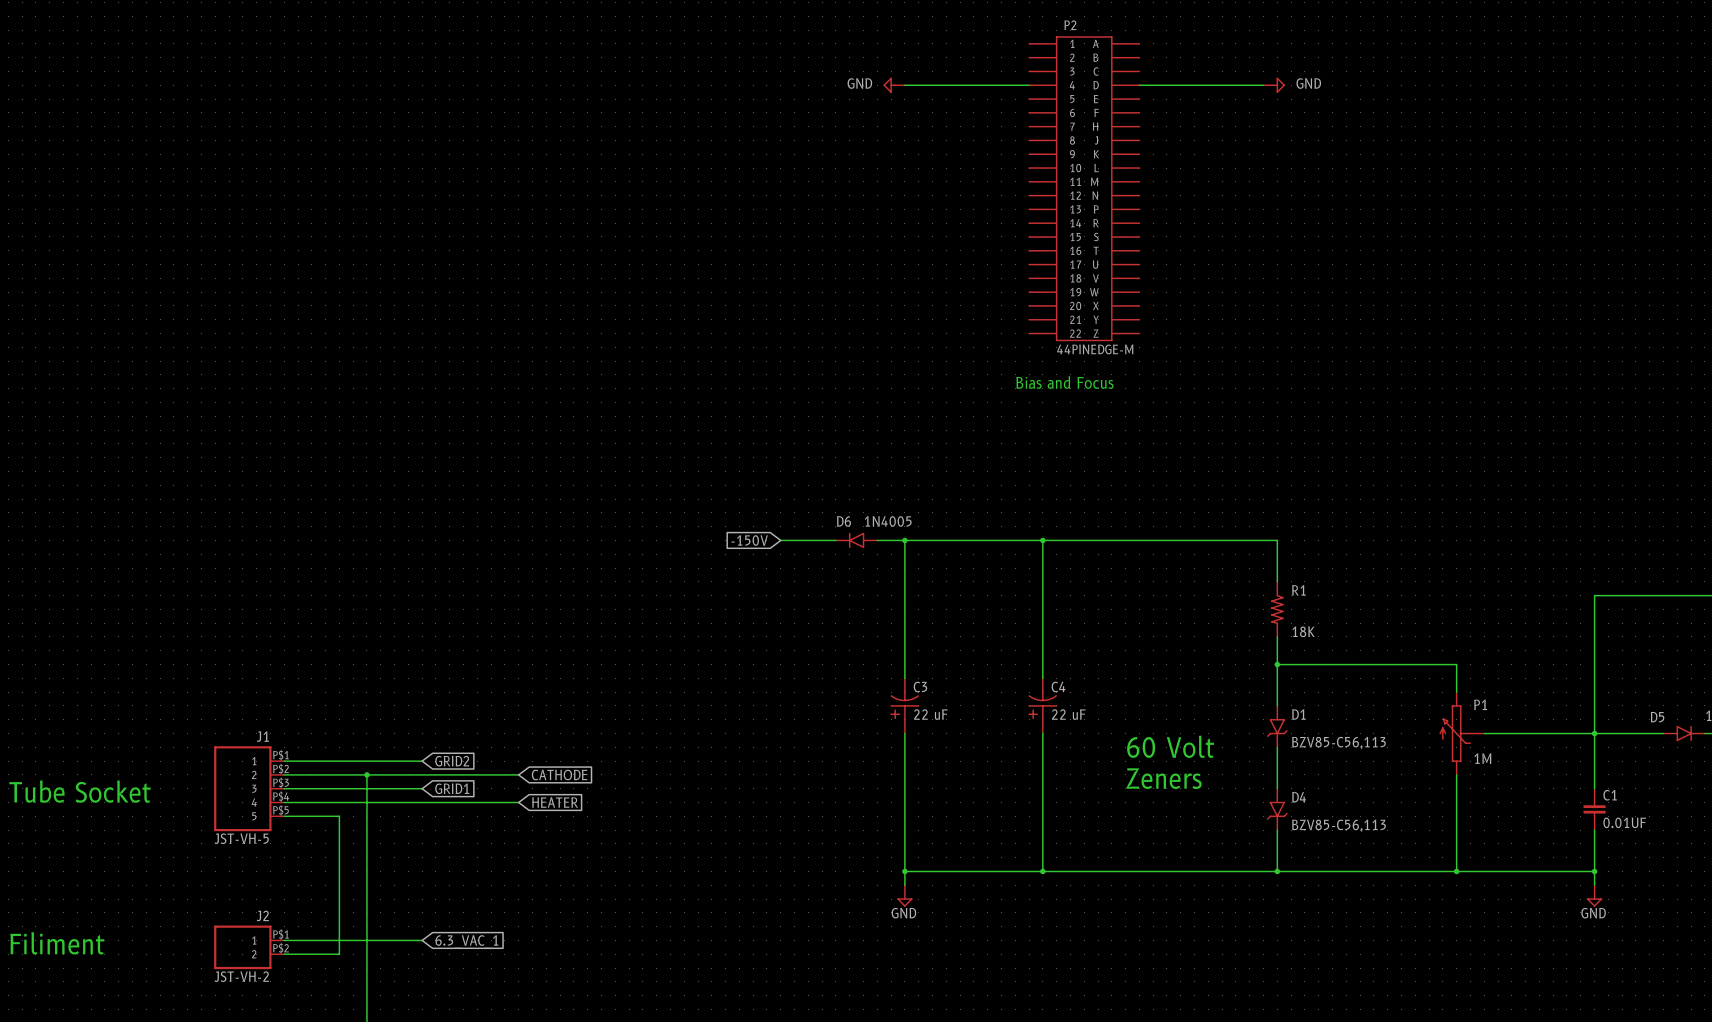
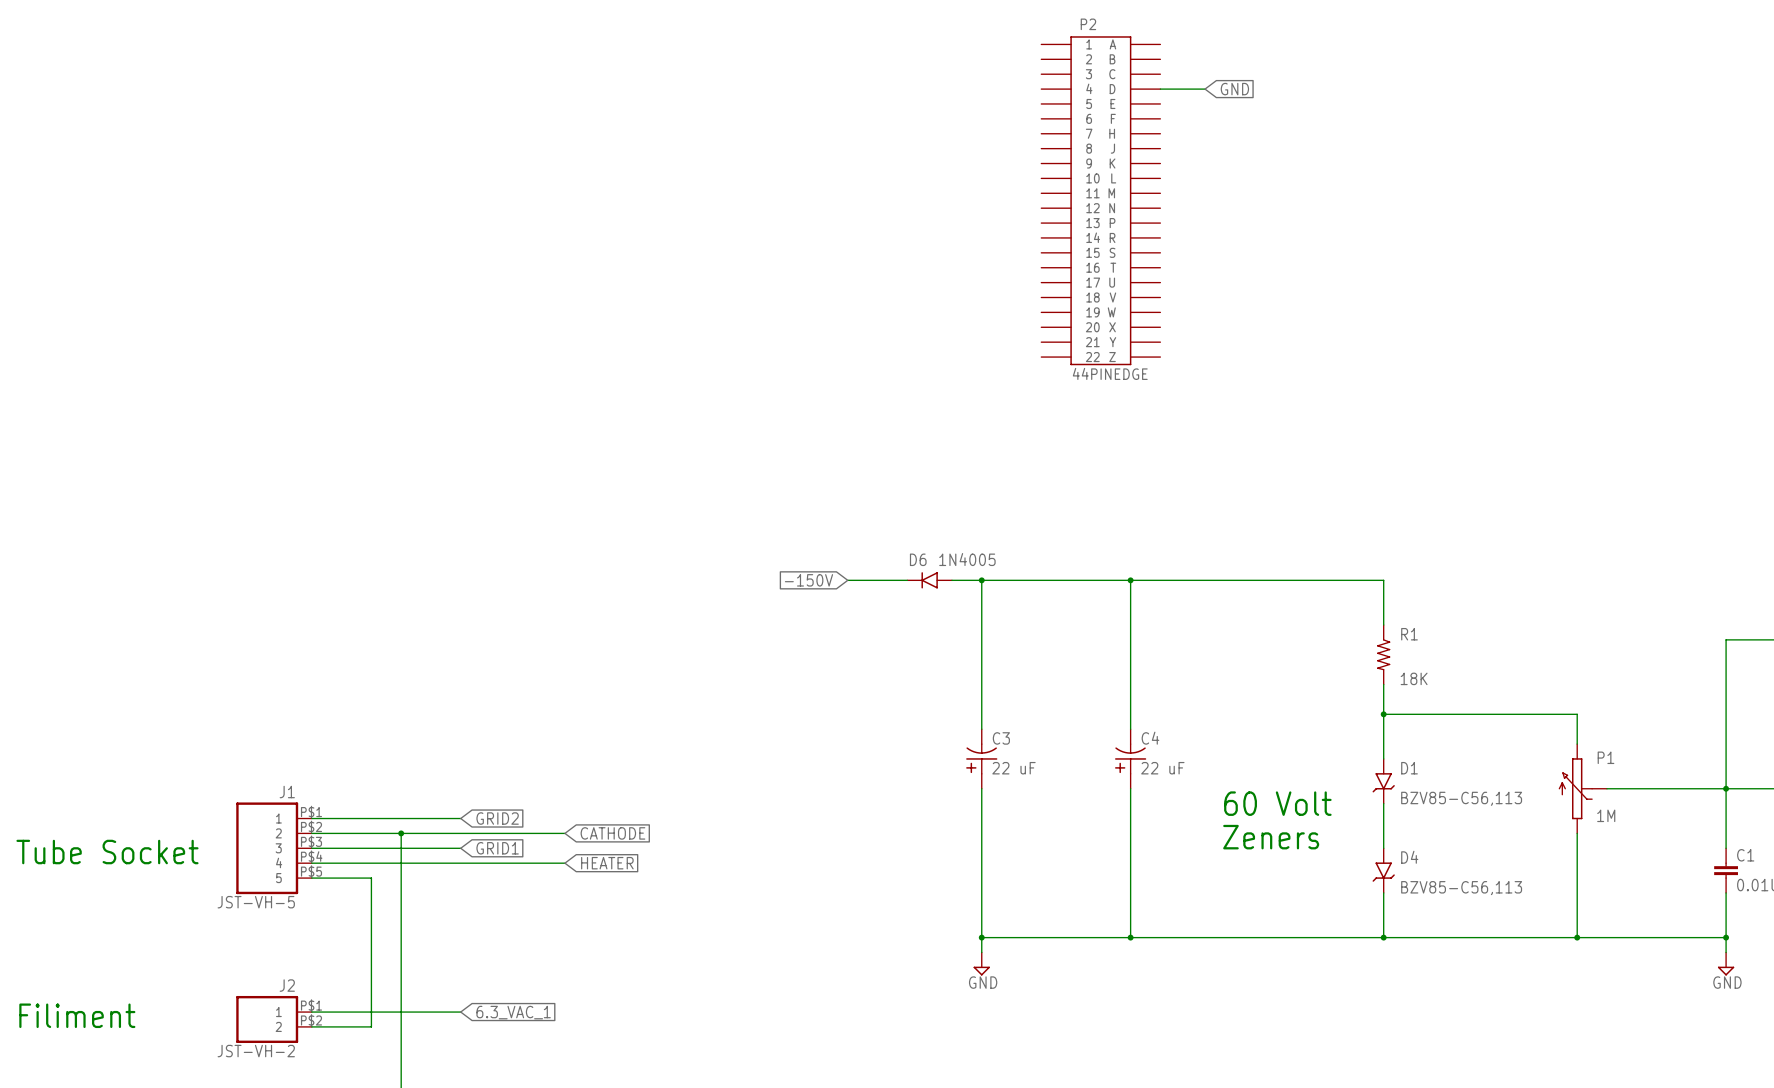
power symbol: GND (894, 85) -> none
wire: (904, 85) (1029, 85) -> none
wire: none -> (1160, 89) (1205, 89)
global label: none -> GND (1234, 89)
wire: (1139, 85) (1263, 85) -> none
power symbol: GND (1274, 85) -> none
P2 position: (1084, 188) -> (1100, 200)
P2 value: 44PINEDGE-M (1095, 349) -> 44PINEDGE (1110, 373)
text: Bias and Focus (1064, 382) -> none

